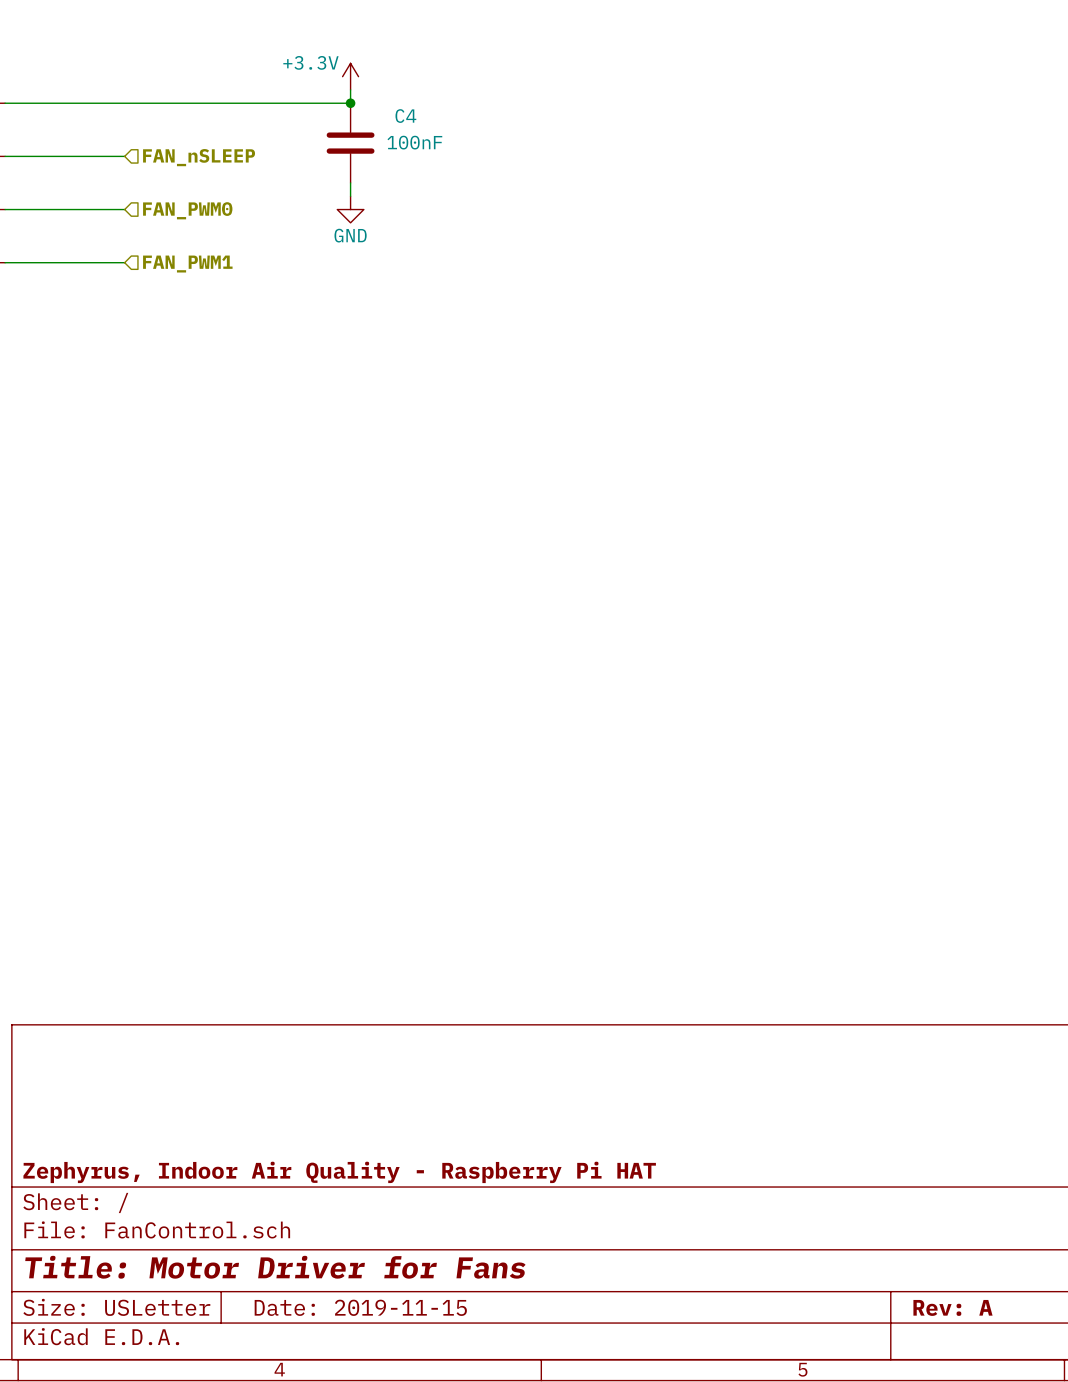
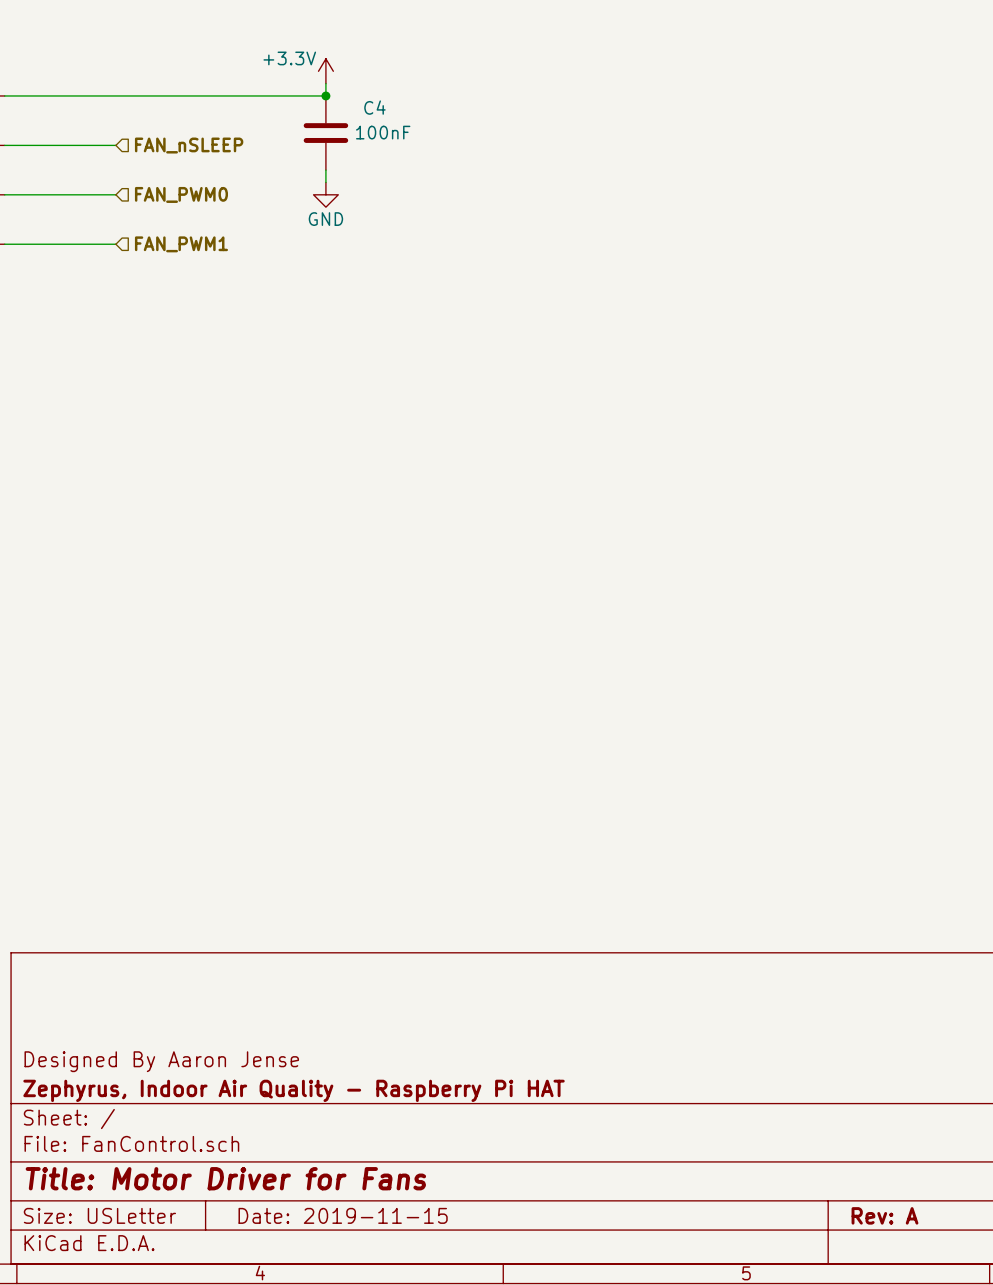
title block: none -> Designed By Aaron Jense (161, 1061)

